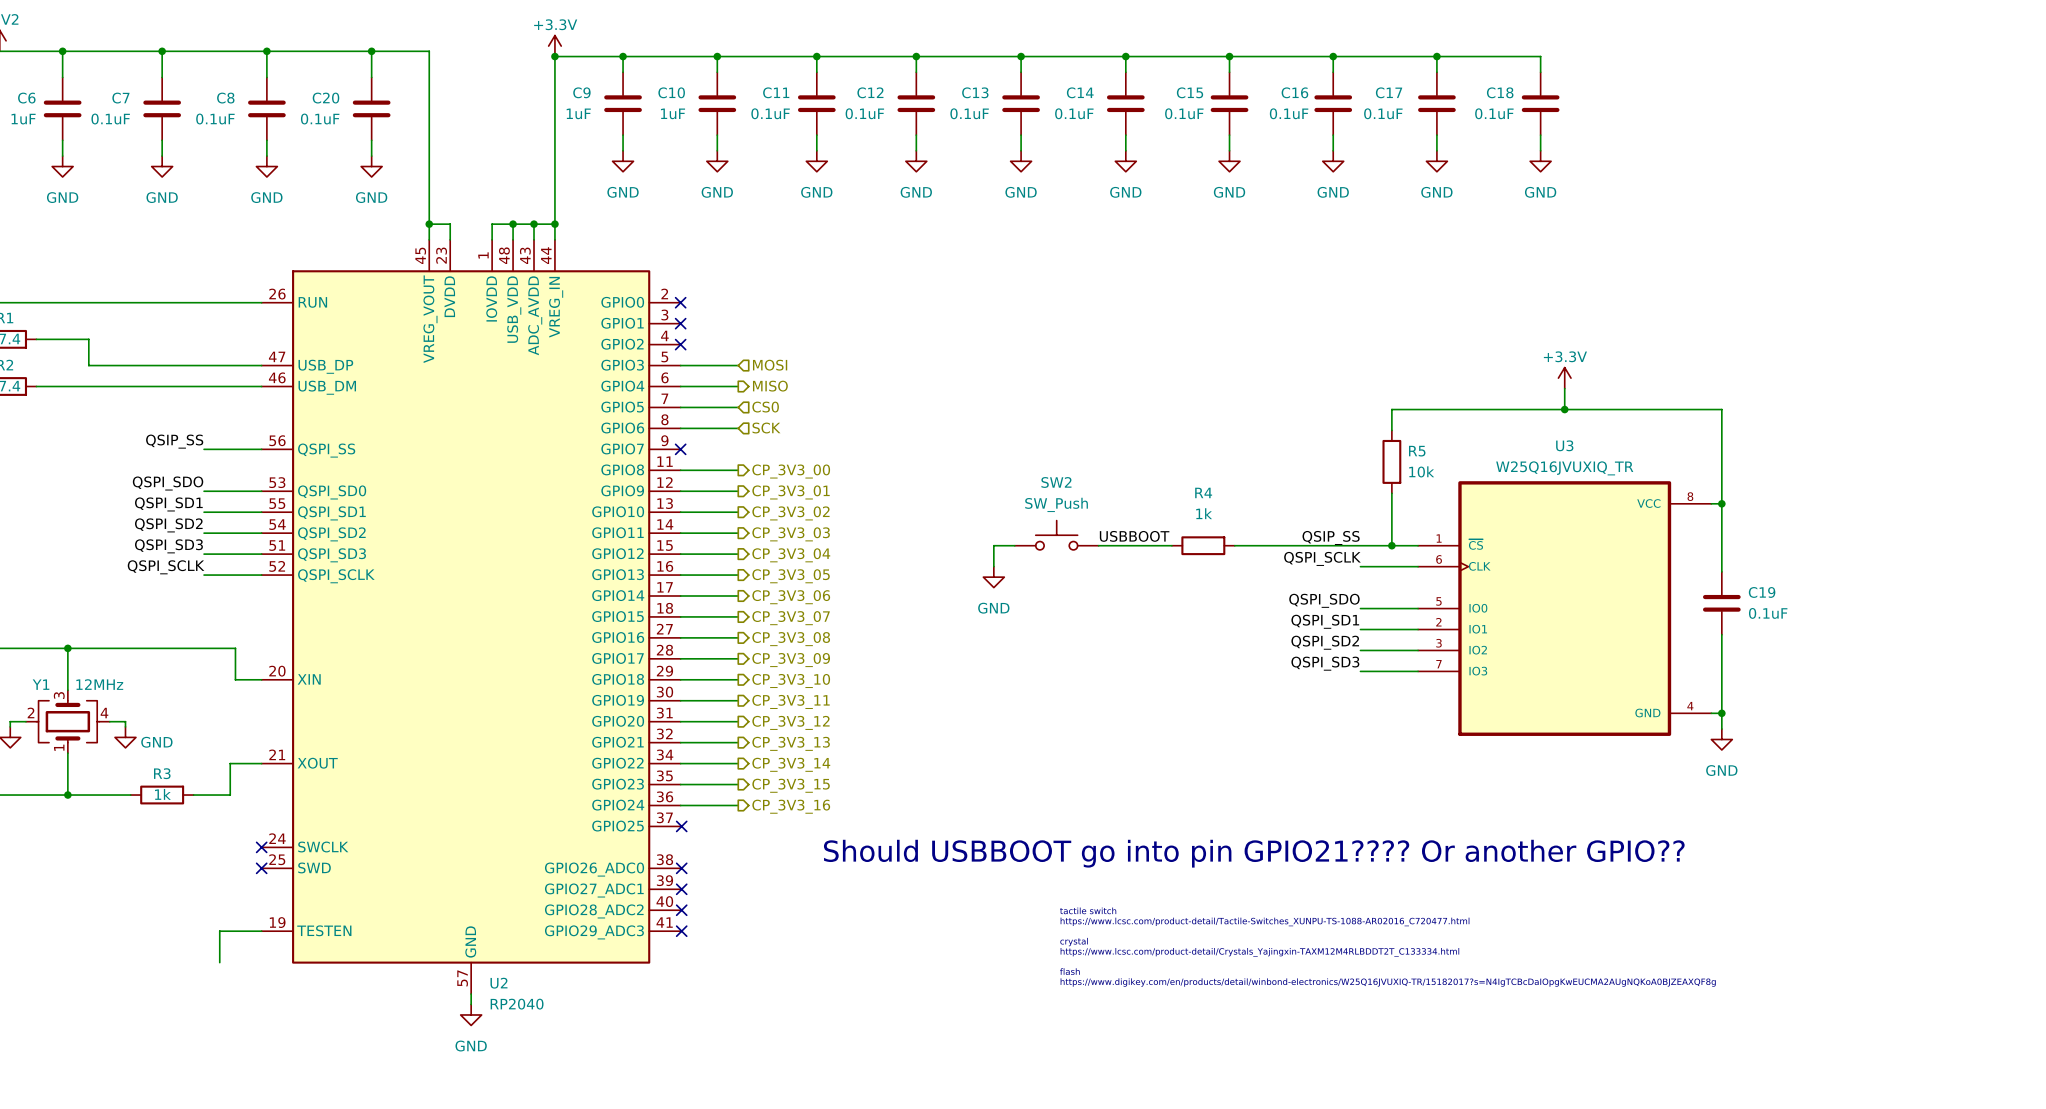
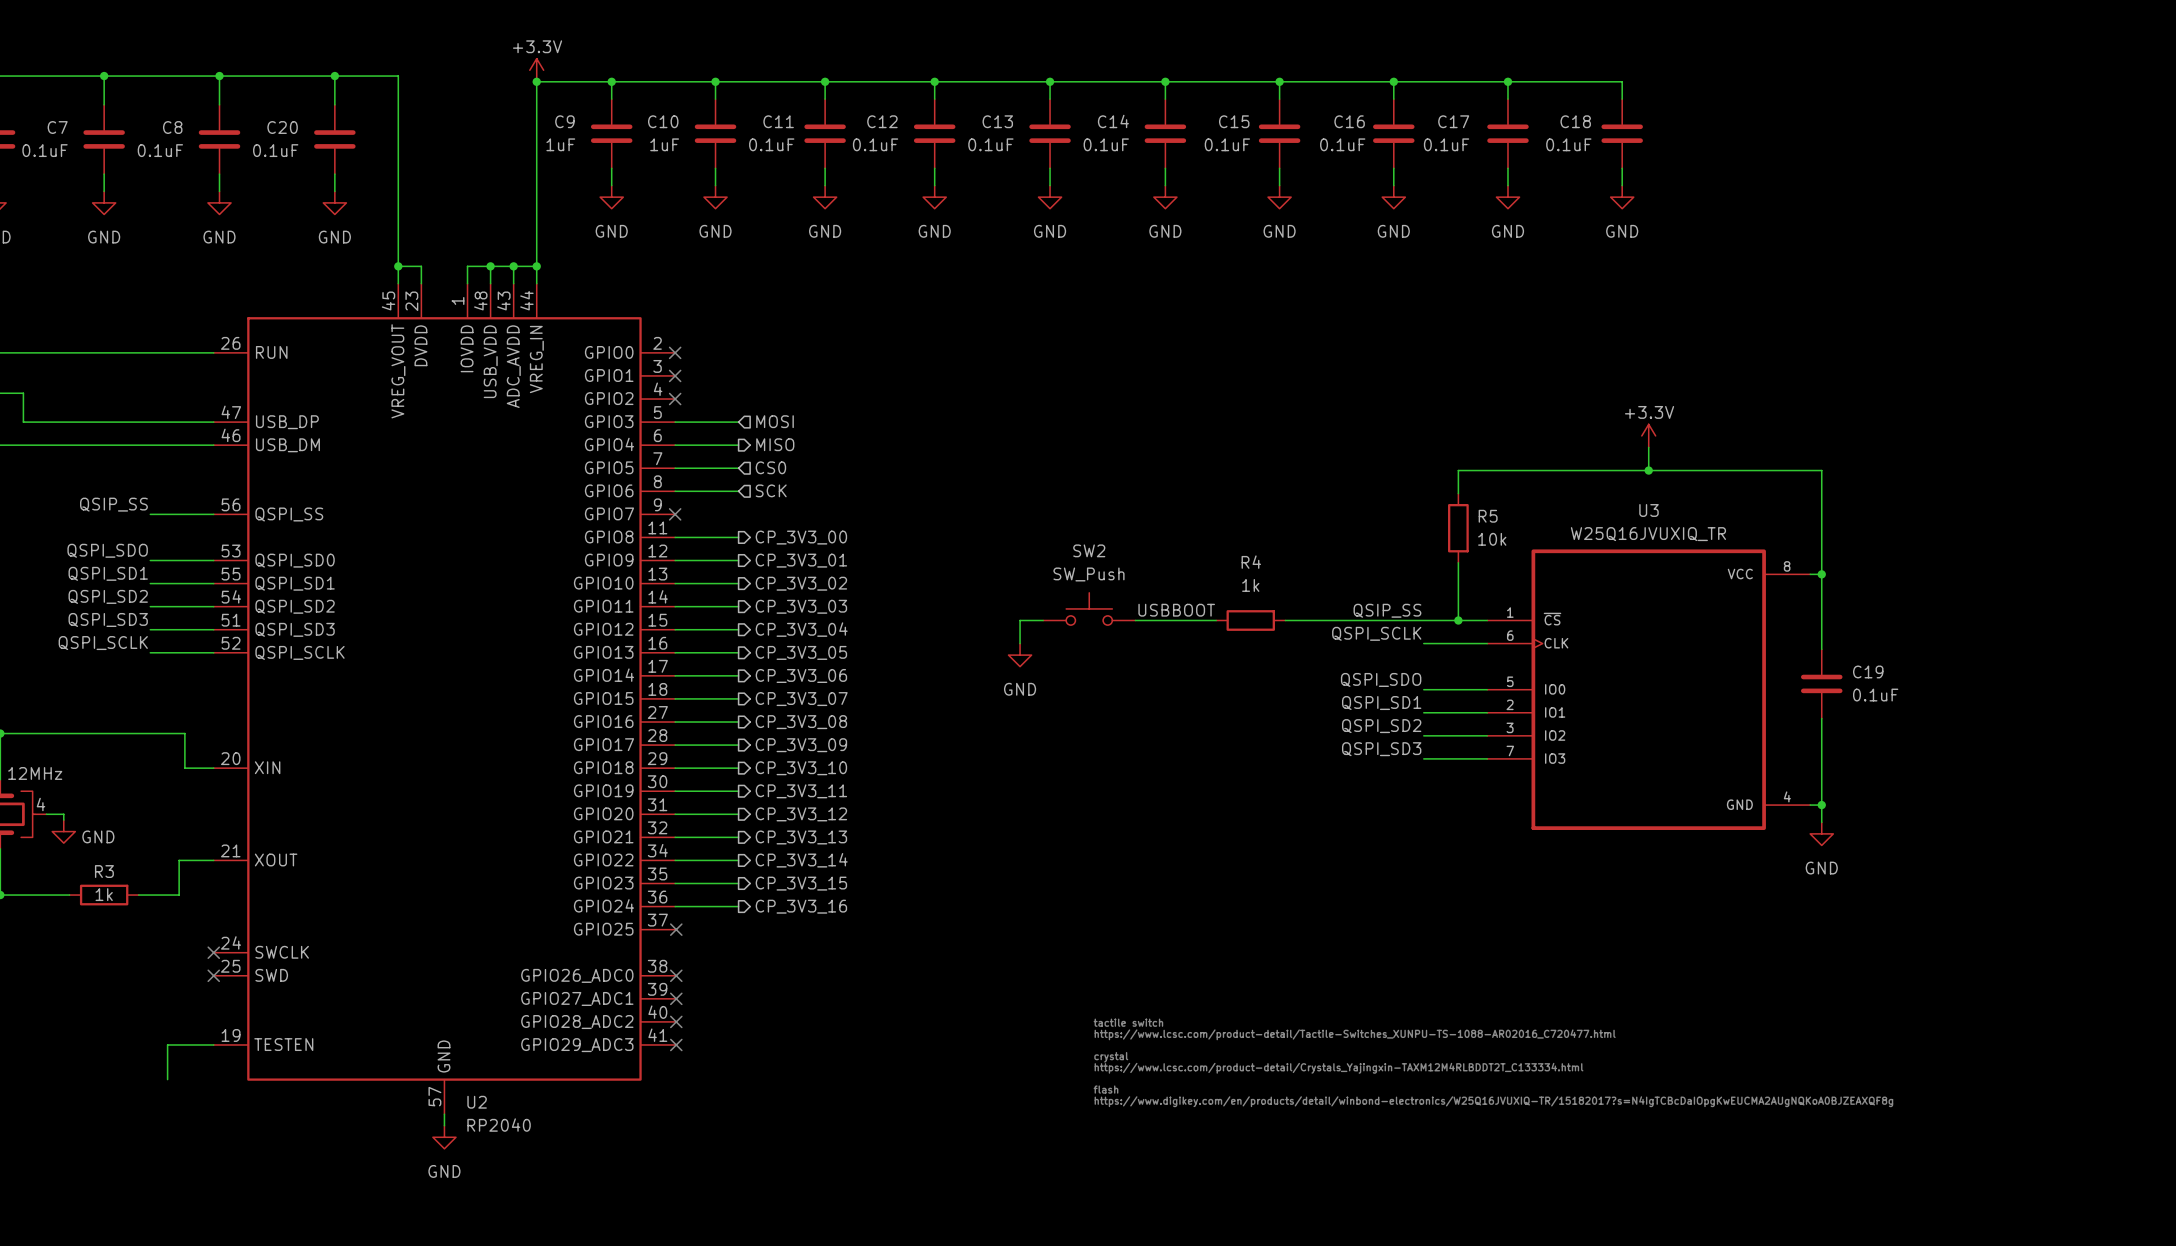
text: Should USBBOOT go into pin GPIO21???? Or another GPIO?? (1254, 853) -> none

